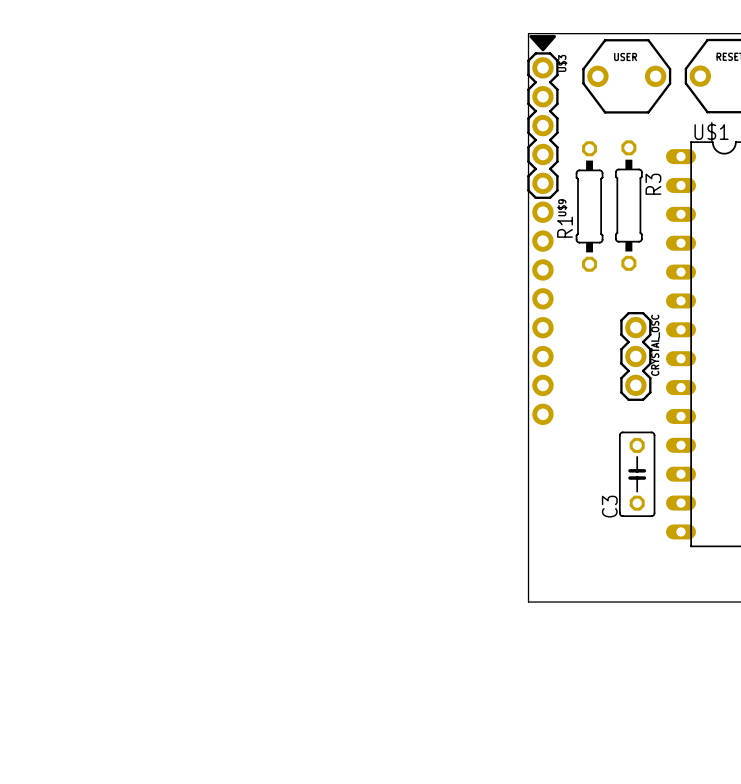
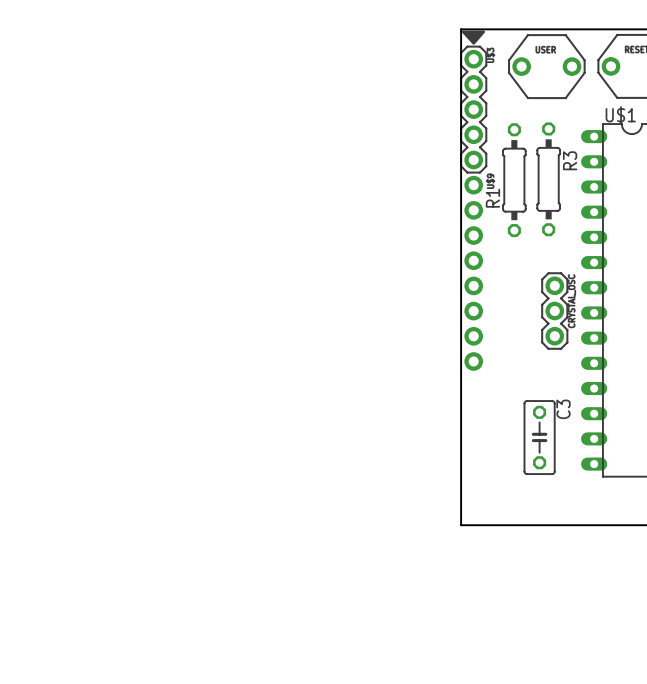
C3 rotation: 0° (637, 474) -> 180° (539, 437)

